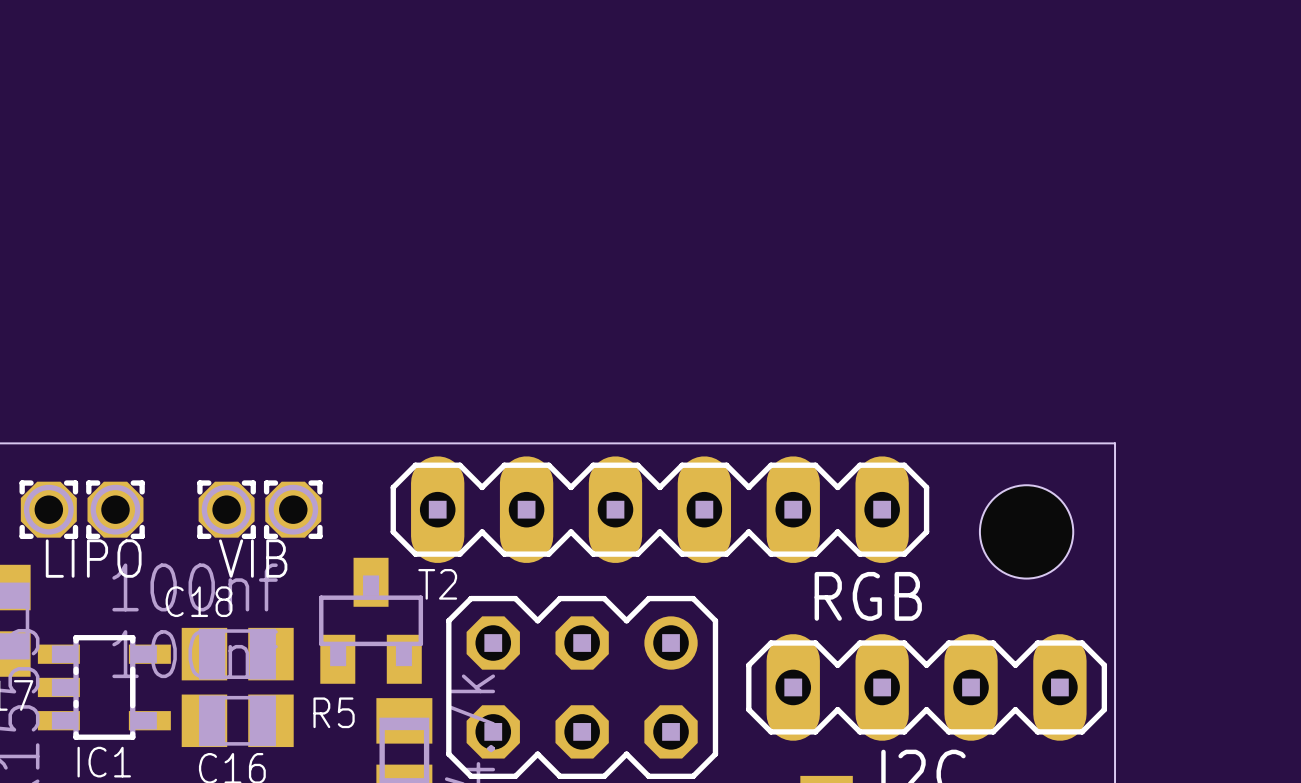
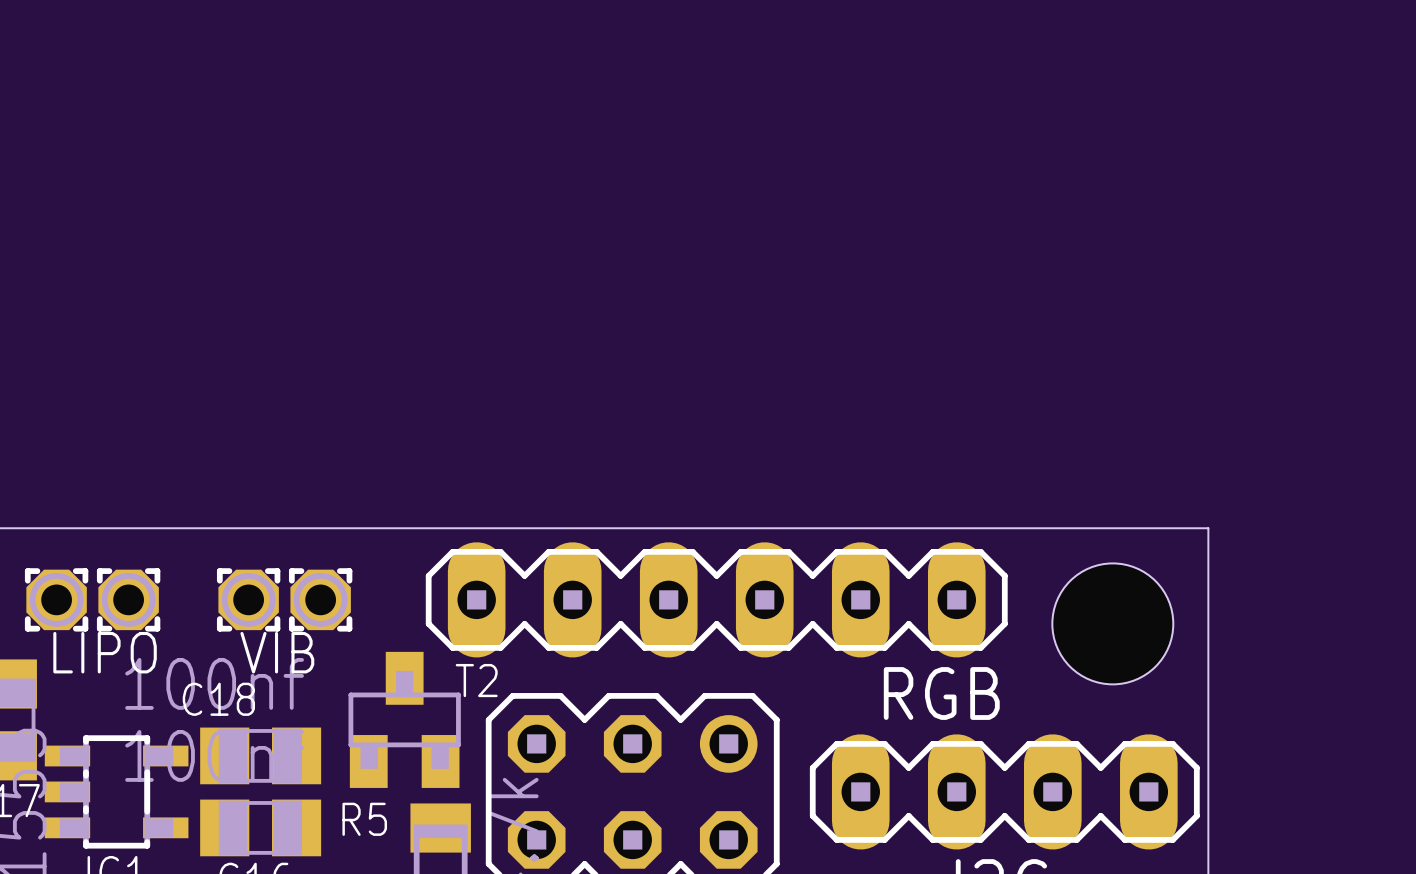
hole size: [979, 485, 1074, 579] -> [1052, 563, 1174, 685]

